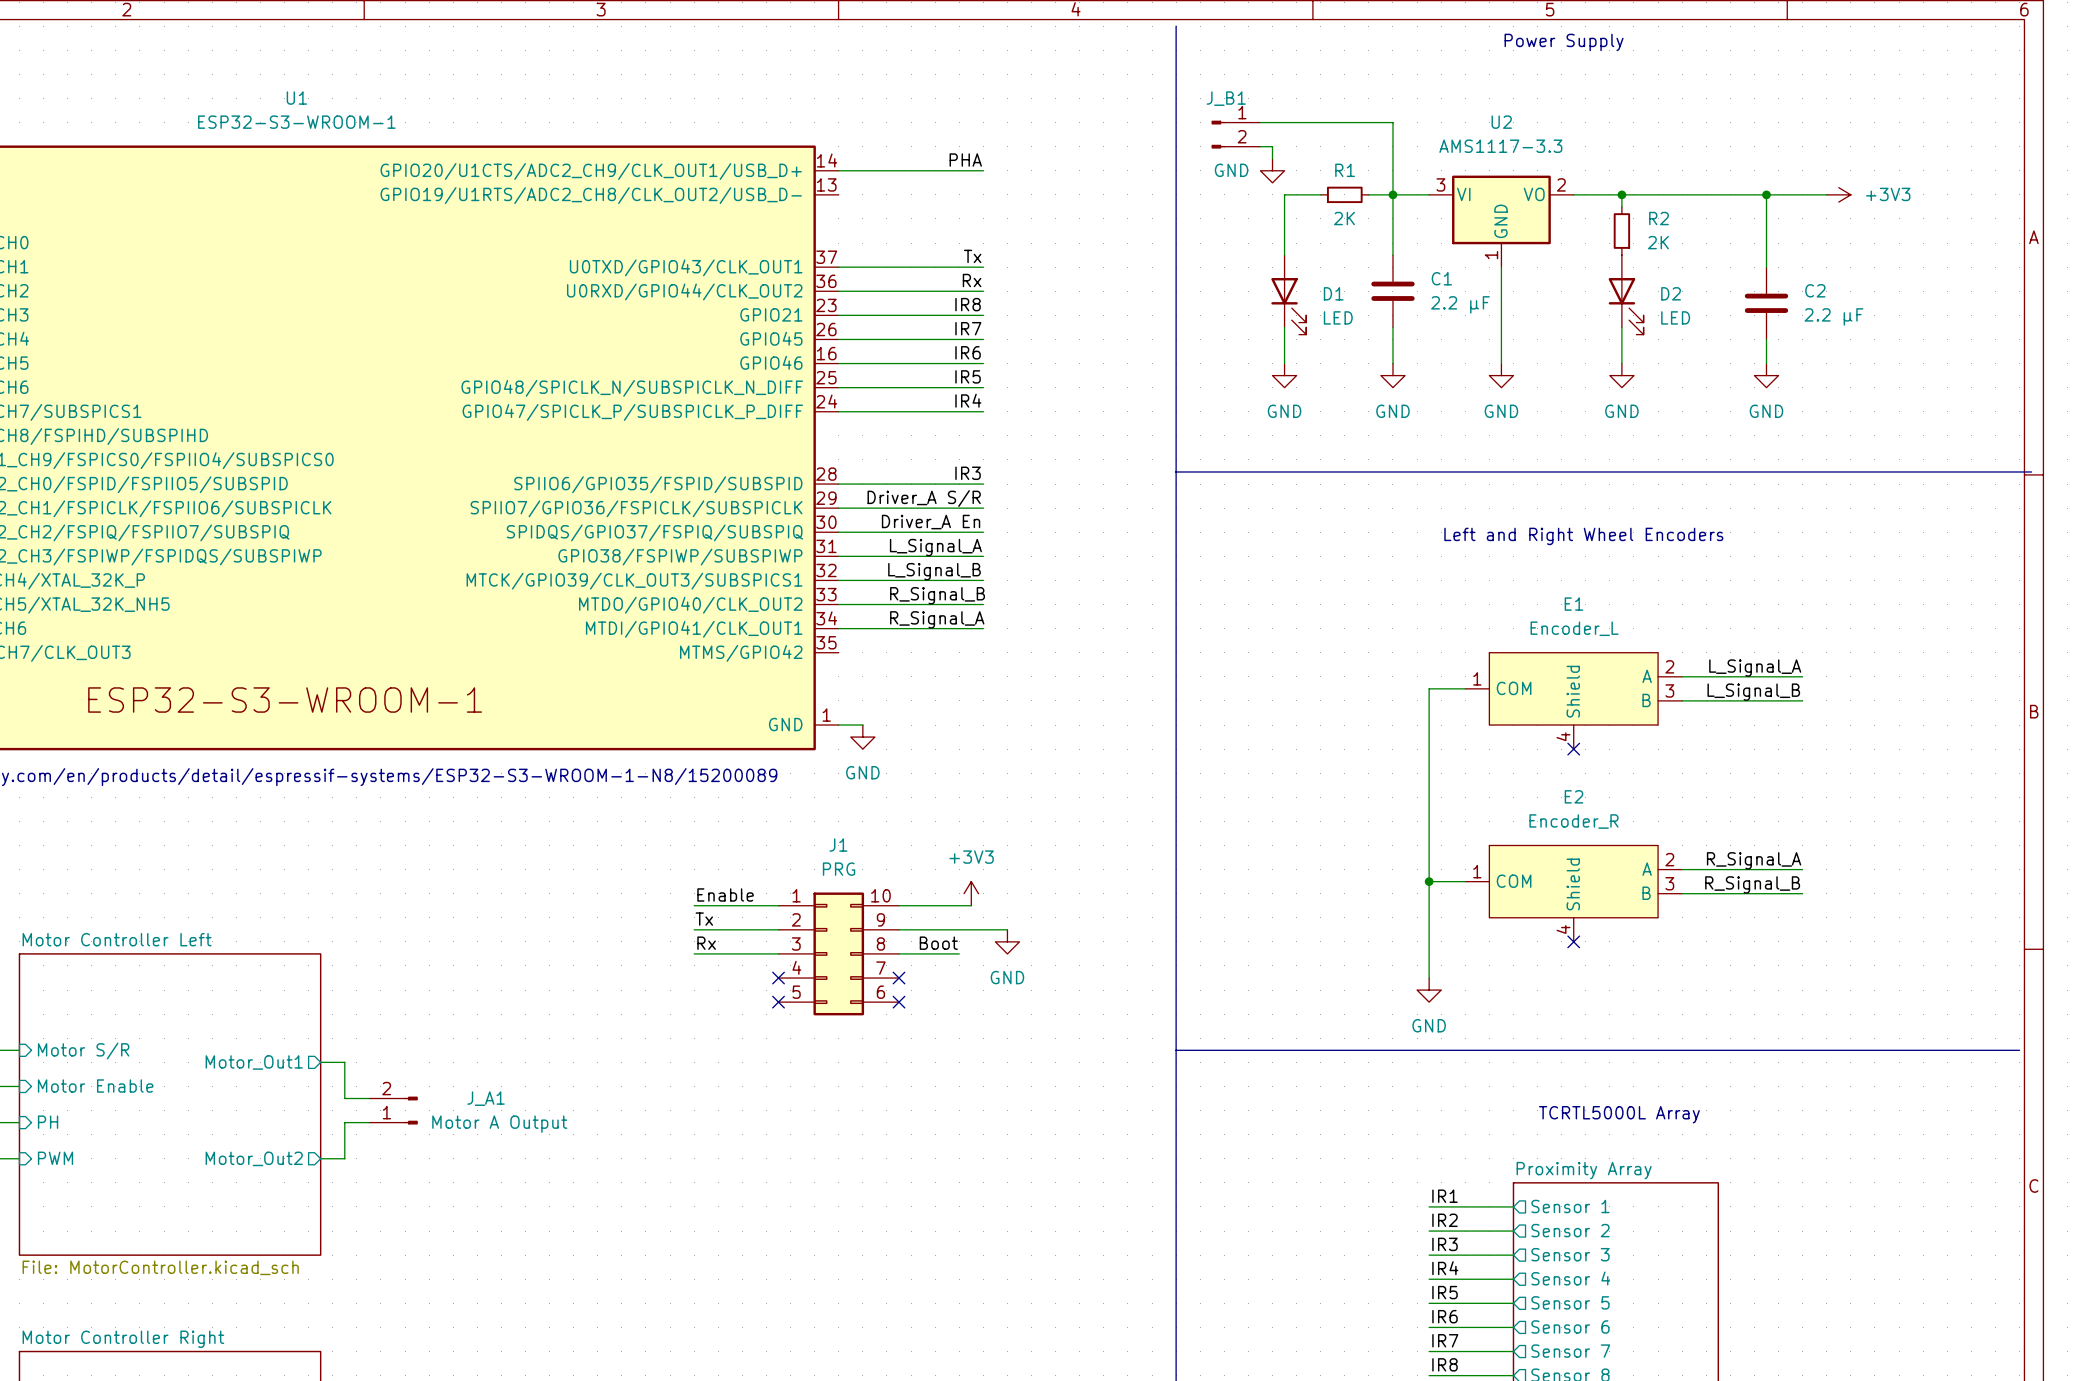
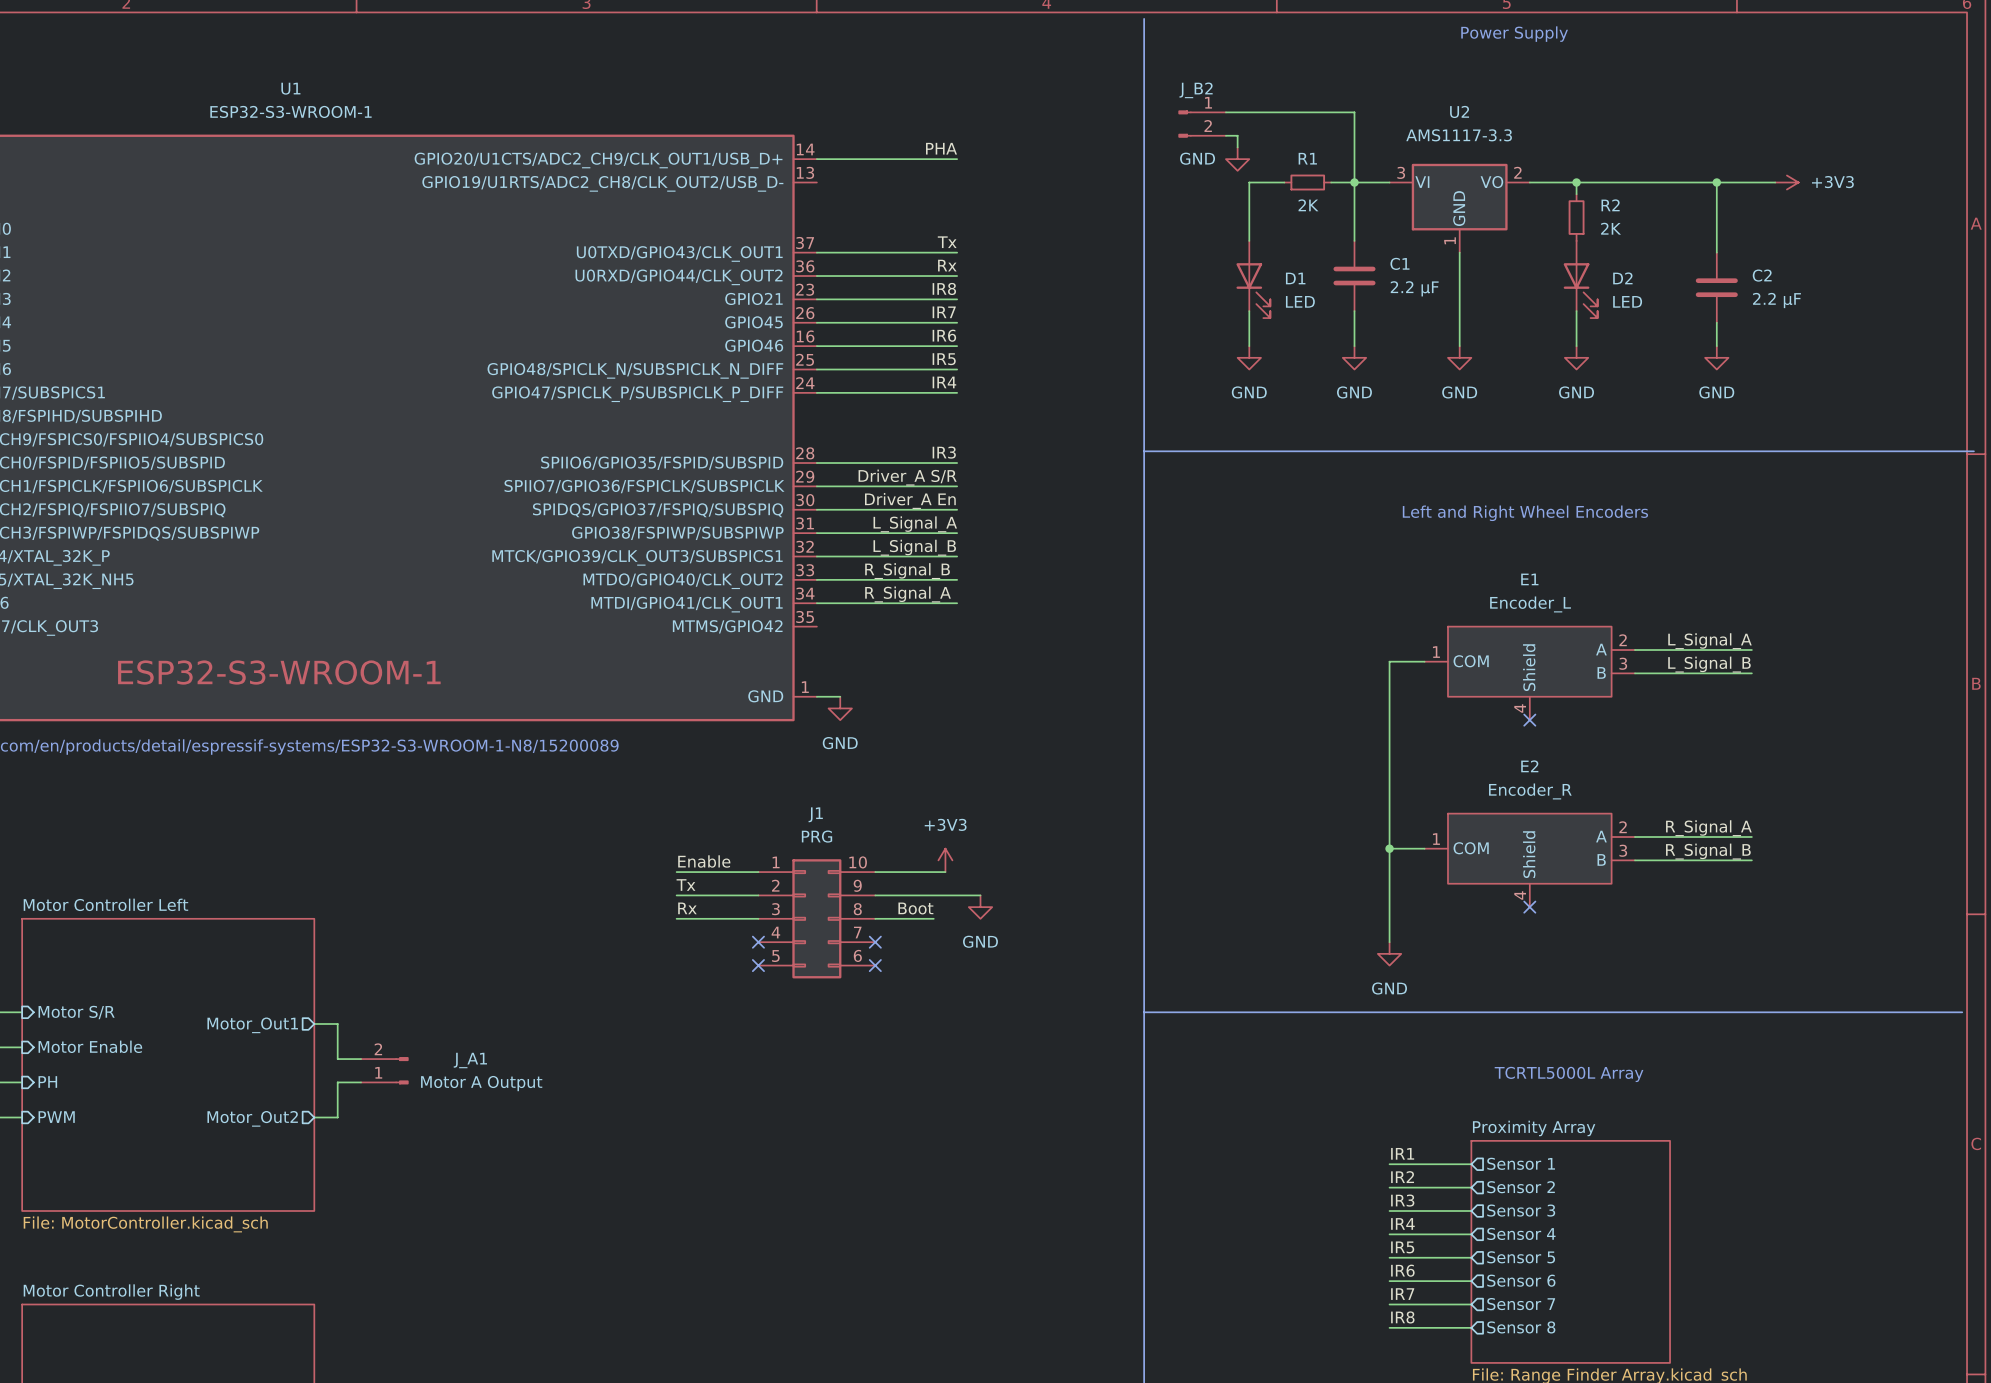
J_B1 name: J_B1 (1226, 98) -> J_B2 (1196, 90)

